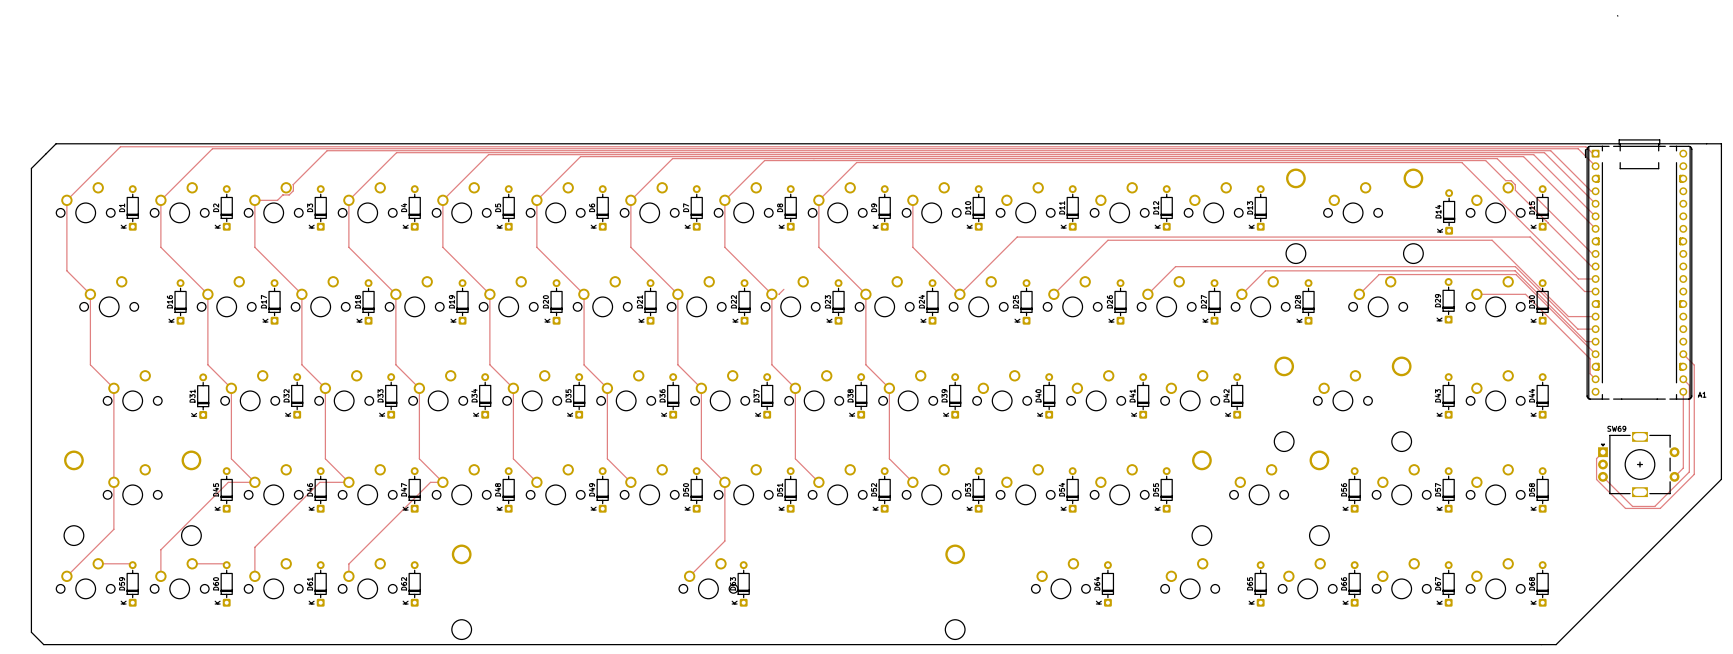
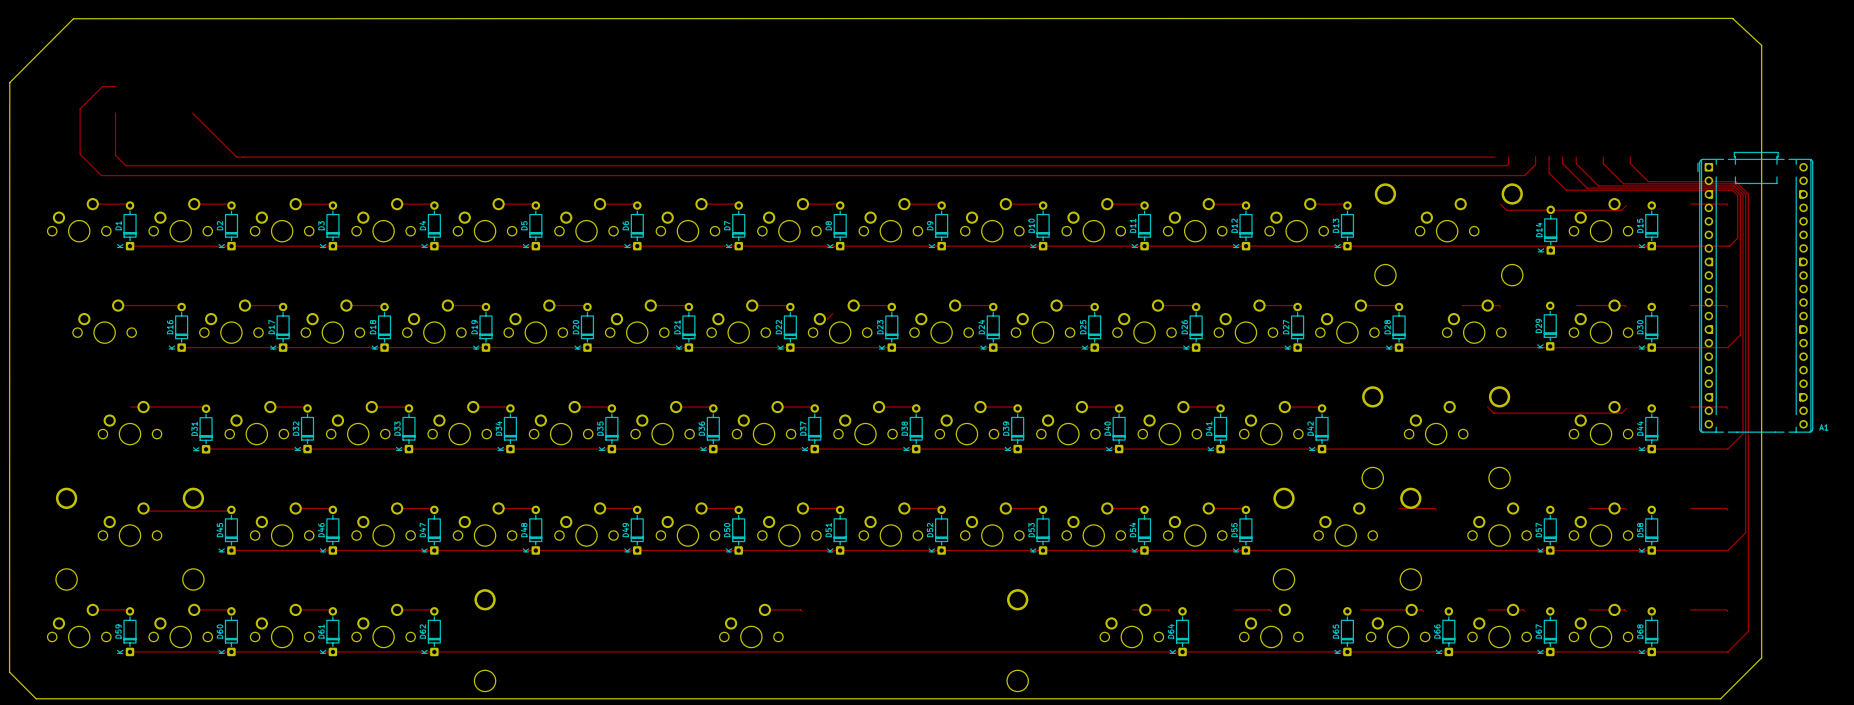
board edge: none -> (1732, 18) (73, 18) (9, 82) (9, 672) (36, 698) (1720, 698) (1761, 657) (1761, 45) (1732, 18)
track: none -> (115, 86) (102, 86) (80, 109) (80, 154) (101, 175) (1524, 175) (1535, 164) (1535, 157)
track: none -> (115, 113) (115, 155) (125, 165) (1506, 165) (1508, 163) (1508, 157)
track: none -> (192, 113) (236, 157) (1495, 157)
board edge: (56, 143) (31, 168) (31, 632) (43, 644) (1556, 644) (1721, 479) (1721, 143) (56, 143) -> none
track: none -> (1549, 157) (1549, 173) (1566, 190) (1732, 190) (1737, 195) (1737, 238) (1729, 246) (130, 246)
track: none -> (1562, 157) (1562, 163) (1587, 188) (1733, 188) (1740, 195) (1740, 335) (1727, 347) (181, 347)
track: none -> (1576, 157) (1576, 163) (1598, 185) (1734, 185) (1743, 194) (1743, 433) (1727, 449) (206, 449)
track: none -> (1603, 157) (1603, 163) (1623, 183) (1735, 183) (1745, 194) (1745, 532) (1727, 550) (231, 550)
track: none -> (1630, 157) (1630, 163) (1648, 181) (1735, 181) (1748, 194) (1748, 631) (1727, 651)
track: (1595, 153) (1592, 153) (1585, 146) (120, 146) (66, 200) (66, 270) (90, 294) (90, 364) (113, 388) (113, 529) (66, 576) -> none
track: (1595, 166) (1578, 148) (212, 148) (160, 200) (160, 247) (207, 294) (207, 364) (231, 388) (231, 458) (254, 482) (228, 482) (160, 549) (160, 576) -> none
track: none -> (92, 204) (130, 205)
track: none -> (194, 204) (231, 205)
track: none -> (295, 204) (332, 205)
track: none -> (397, 204) (434, 205)
track: none -> (498, 204) (535, 205)
track: none -> (600, 204) (637, 205)
track: none -> (701, 204) (738, 205)
track: none -> (802, 204) (840, 205)
track: none -> (904, 204) (941, 205)
track: none -> (1005, 204) (1043, 205)
track: none -> (1107, 204) (1144, 205)
track: none -> (1208, 204) (1246, 205)
track: none -> (1310, 204) (1347, 205)
track: none -> (1500, 204) (1506, 210) (1621, 210) (1626, 205)
track: none -> (1690, 204) (1727, 205)
track: (1595, 191) (1591, 191) (1550, 150) (327, 150) (293, 184) (293, 190) (289, 194) (283, 194) (277, 200) (254, 200) (254, 247) (301, 294) (301, 364) (325, 388) (325, 458) (348, 482) (319, 482) (254, 547) (254, 576) -> none
track: (912, 200) (912, 247) (959, 294) (1017, 237) (1530, 237) (1584, 291) (1595, 291) -> none
track: (1595, 203) (1544, 152) (396, 152) (348, 200) (348, 247) (395, 294) -> none
track: (1595, 216) (1533, 154) (488, 154) (442, 200) (442, 247) (489, 294) (489, 364) (513, 388) (513, 458) (536, 482) -> none
track: (1595, 228) (1523, 156) (580, 156) (536, 200) (536, 247) (584, 294) (584, 365) (607, 388) (607, 458) (630, 482) -> none
track: (1595, 253) (1595, 257) (1497, 158) (672, 158) (630, 200) (630, 247) (677, 294) (677, 364) (701, 388) (701, 458) (724, 482) (724, 541) (689, 576) -> none
track: (1595, 266) (1591, 266) (1515, 190) (1515, 184) (1511, 180) (1505, 180) (1485, 160) (764, 160) (724, 200) (724, 247) (771, 294) (771, 364) (795, 388) (795, 458) (818, 482) -> none
track: (1595, 278) (1578, 278) (1461, 162) (856, 162) (818, 200) (818, 247) (865, 294) (865, 364) (889, 388) (889, 458) (912, 482) -> none
track: none -> (118, 305) (181, 307)
track: none -> (245, 305) (283, 307)
track: none -> (346, 305) (384, 307)
track: none -> (447, 305) (485, 307)
track: none -> (549, 305) (587, 307)
track: none -> (650, 305) (688, 307)
track: none -> (752, 305) (790, 307)
track: none -> (853, 305) (891, 307)
track: none -> (955, 305) (993, 307)
track: none -> (1056, 305) (1094, 307)
track: none -> (1158, 305) (1196, 307)
track: none -> (1259, 305) (1297, 307)
track: none -> (1360, 305) (1399, 307)
track: none -> (1462, 305) (1500, 307)
track: none -> (1576, 305) (1626, 307)
track: none -> (1690, 305) (1727, 307)
track: (395, 291) (395, 364) (419, 388) (419, 458) (442, 482) (430, 482) (348, 563) (348, 576) -> none
track: (1053, 294) (1107, 240) (1492, 240) (1568, 316) (1595, 316) -> none
track: (1147, 294) (1175, 266) (1515, 266) (1577, 329) (1595, 329) -> none
track: (1241, 294) (1265, 270) (1515, 270) (1585, 341) (1595, 341) -> none
track: (1359, 294) (1379, 274) (1515, 274) (1595, 354) -> none
track: (1476, 294) (1525, 294) (1590, 358) (1590, 373) (1595, 379) -> none
track: (1683, 354) (1694, 365) (1694, 474) (1660, 508) (1625, 508) (1596, 479) (1596, 458) (1602, 452) -> none
track: none -> (130, 407) (206, 408)
track: none -> (270, 407) (307, 408)
track: none -> (371, 407) (408, 408)
track: none -> (473, 407) (510, 408)
track: none -> (574, 407) (611, 408)
track: none -> (676, 407) (713, 408)
track: none -> (777, 407) (814, 408)
track: none -> (879, 407) (916, 408)
track: none -> (980, 407) (1017, 408)
track: none -> (1081, 407) (1119, 408)
track: none -> (1183, 407) (1220, 408)
track: none -> (1284, 407) (1322, 408)
track: none -> (1487, 407) (1493, 413) (1621, 413) (1626, 408)
track: none -> (1690, 407) (1727, 408)
track: (1683, 379) (1689, 385) (1689, 471) (1654, 506) (1632, 506) (1602, 476) -> none
track: (1683, 391) (1683, 468) (1674, 476) -> none
part: (1448, 395) -> none
part: (1638, 464) -> none
track: none -> (143, 508) (146, 511) (231, 509)
track: none -> (295, 508) (332, 509)
track: none -> (397, 508) (434, 509)
track: none -> (498, 508) (535, 509)
track: none -> (600, 508) (637, 509)
track: none -> (701, 508) (738, 509)
track: none -> (802, 508) (840, 509)
track: none -> (904, 508) (941, 509)
track: none -> (1005, 508) (1043, 509)
track: none -> (1107, 508) (1144, 509)
track: none -> (1208, 508) (1245, 509)
track: none -> (1398, 508) (1436, 509)
track: none -> (1589, 508) (1626, 509)
track: none -> (1690, 508) (1727, 509)
part: (1354, 489) -> none
track: none -> (295, 609) (332, 611)
track: none -> (397, 609) (434, 611)
track: none -> (764, 609) (802, 611)
track: none -> (1132, 609) (1169, 611)
track: none -> (1234, 609) (1271, 611)
track: none -> (1360, 609) (1423, 611)
track: none -> (1487, 609) (1524, 611)
track: none -> (1589, 609) (1626, 611)
track: none -> (1690, 609) (1727, 611)
part: (743, 583) -> none
track: none -> (129, 651) (1728, 652)

